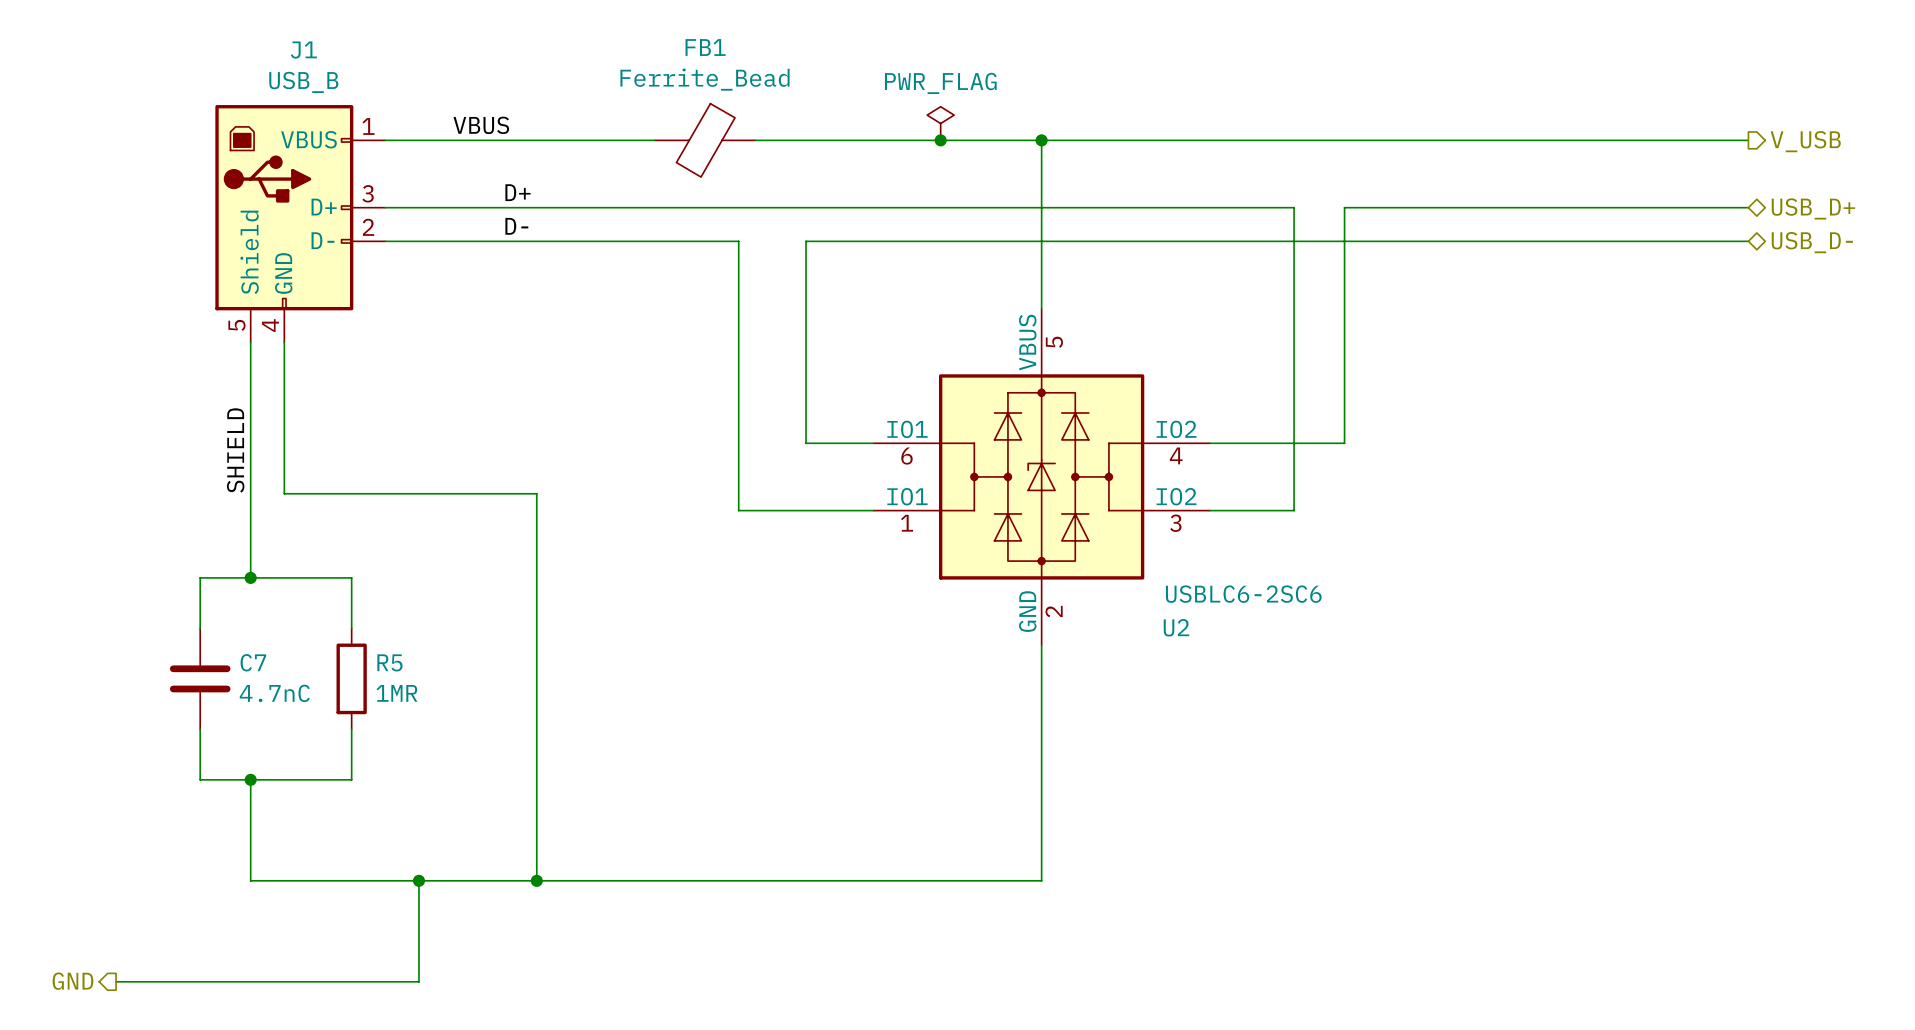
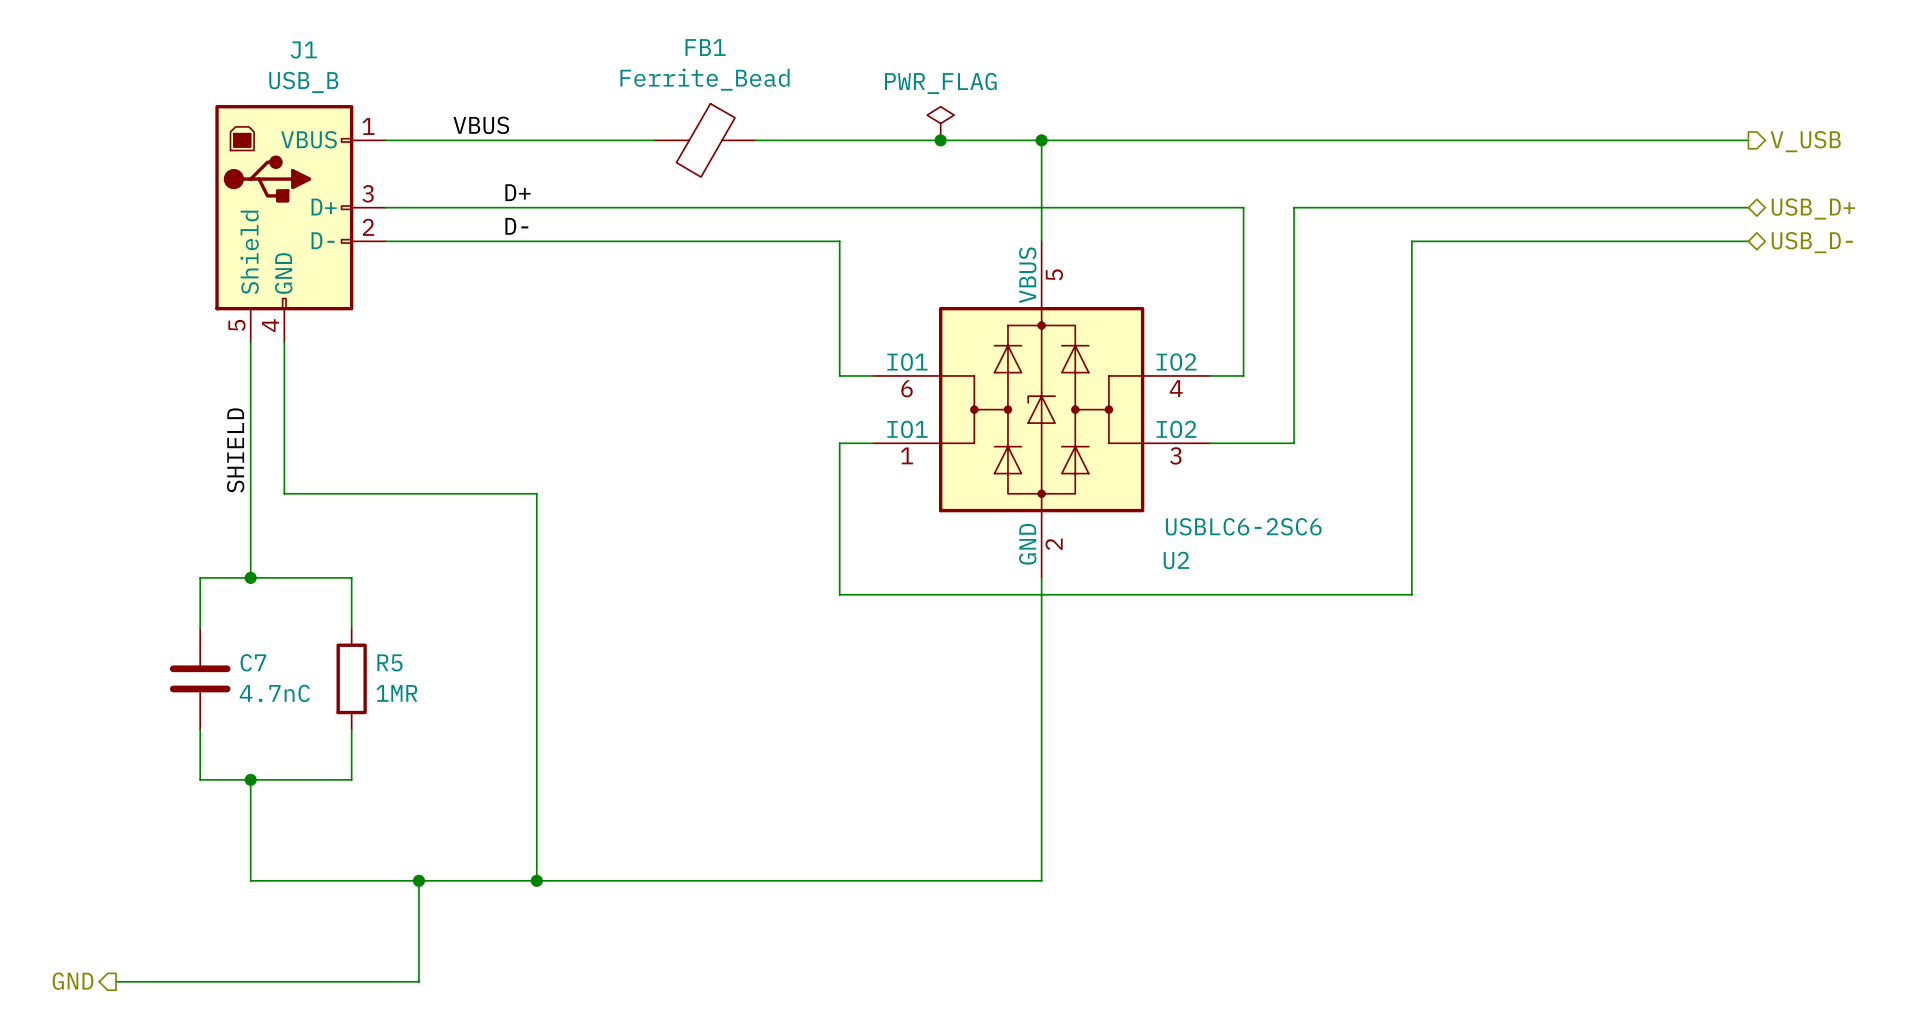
wire: (1243, 207) (1294, 207) -> (1344, 207) (1294, 207)
wire: none -> (1243, 207) (1243, 375) (1209, 375)
wire: (1344, 207) (1344, 443) (1294, 443) (1294, 510) (1209, 510) -> none
wire: (738, 241) (738, 510) (873, 510) -> none
wire: (806, 241) (806, 443) (839, 443) -> (806, 241) (738, 241)
wire: (839, 241) (1411, 241) -> (839, 443) (839, 594) (1411, 594) (1411, 241)
wire: none -> (839, 241) (839, 375) (873, 375)
U2 position: (1041, 476) -> (1041, 409)

